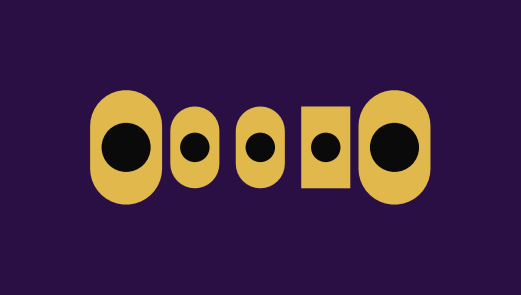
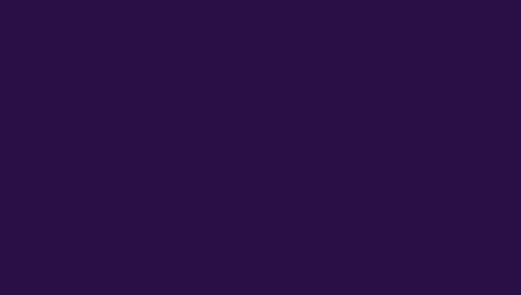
part: (260, 147) -> none

